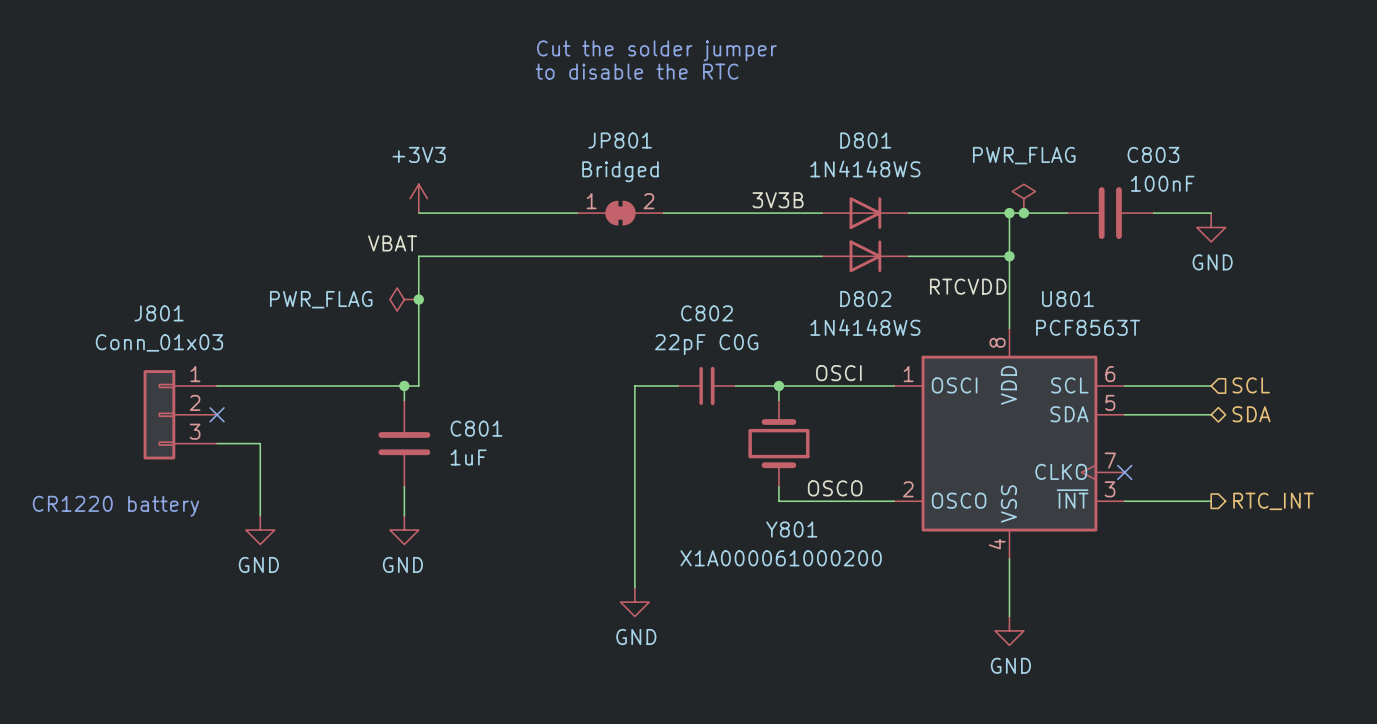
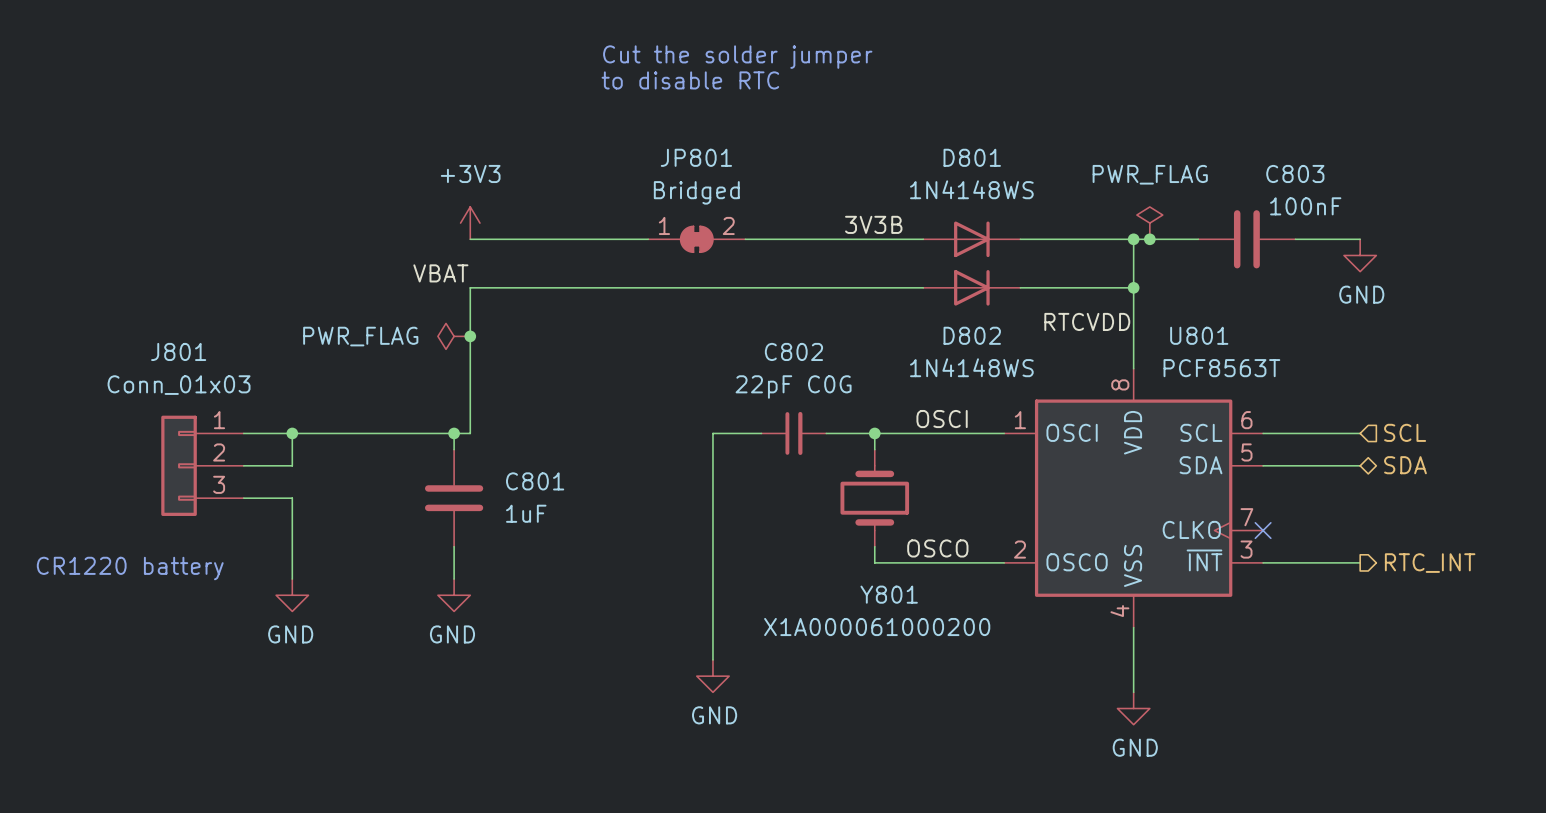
text: to disable the RTC (637, 71) -> to disable RTC (690, 80)
wire: none -> (292, 433) (292, 465) (243, 465)
junction: none -> (292, 433)
no-connect mark: (217, 414) -> none

